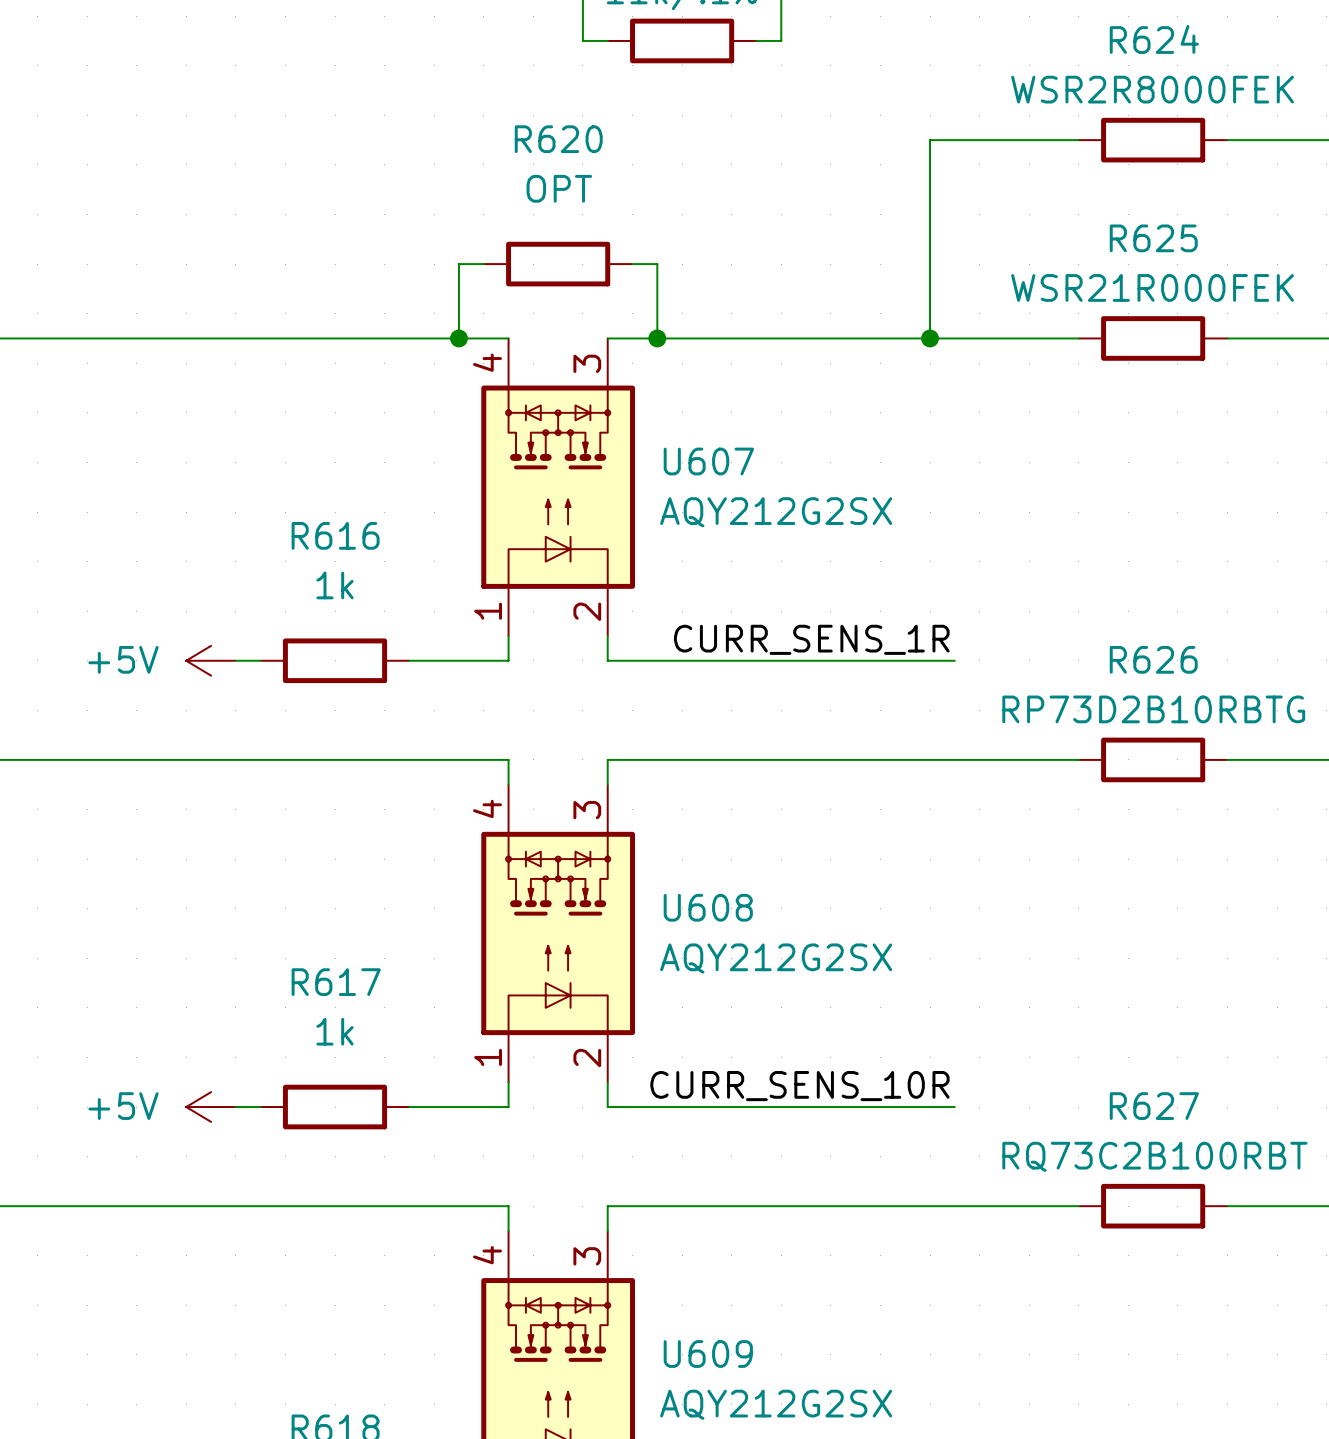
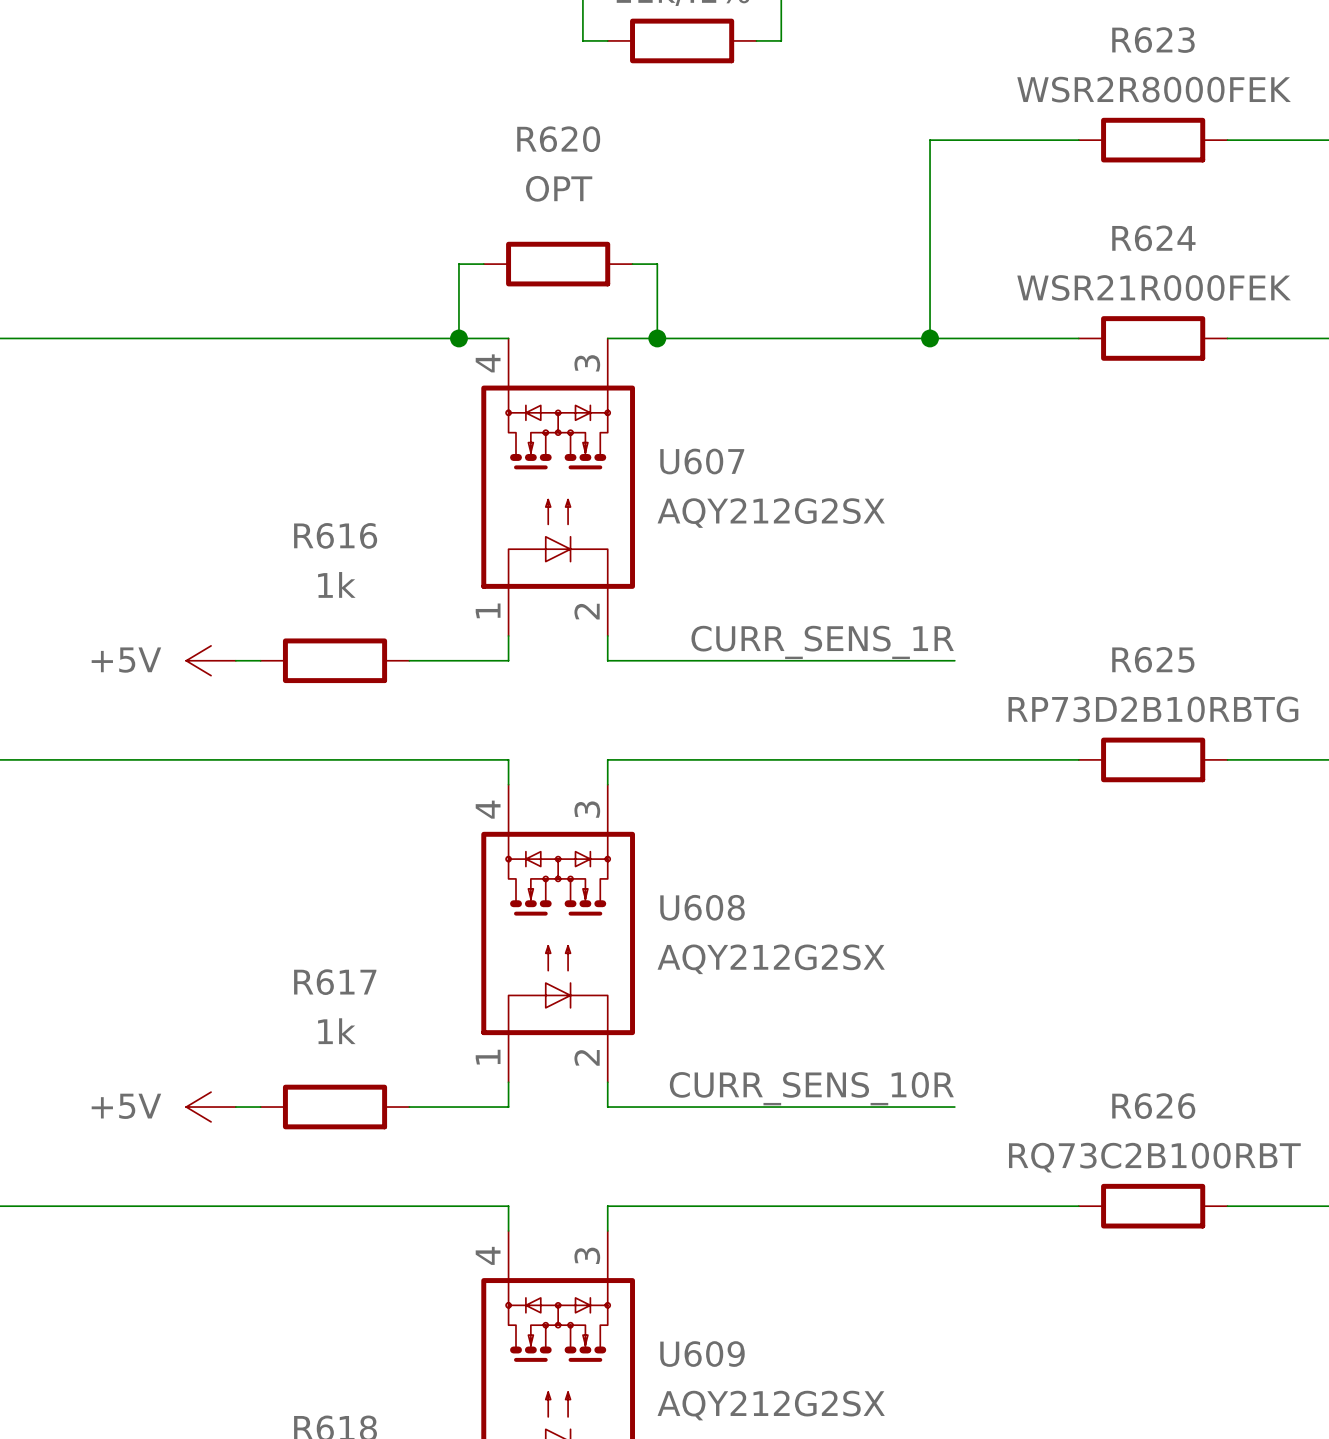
R624 name: R624 (1154, 39) -> R623 (1153, 40)
R625 name: R625 (1153, 238) -> R624 (1153, 238)
R626 name: R626 (1153, 659) -> R625 (1153, 659)
R627 name: R627 (1154, 1106) -> R626 (1153, 1106)

